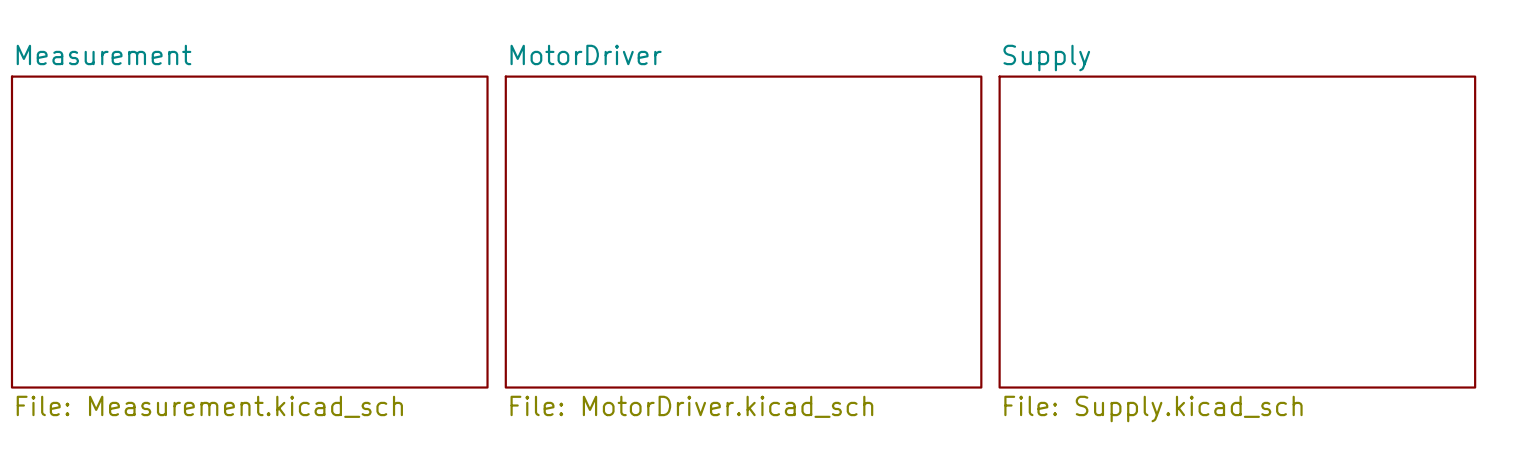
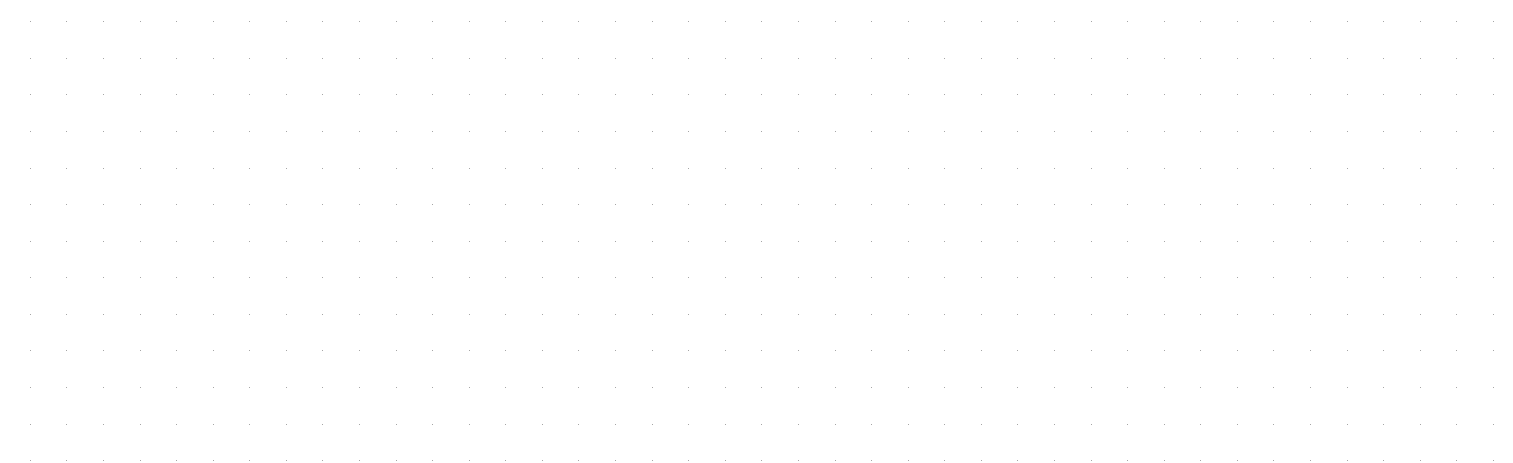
sheet Measurement: File: Measurement.kicad_sch (249, 232) -> none
sheet MotorDriver: File: MotorDriver.kicad_sch (743, 232) -> none
sheet Supply: File: Supply.kicad_sch (1237, 232) -> none

